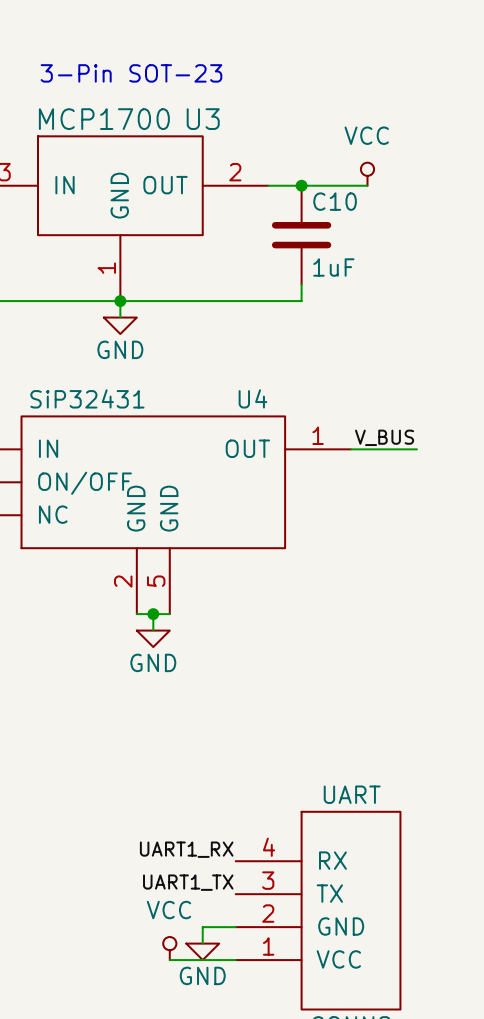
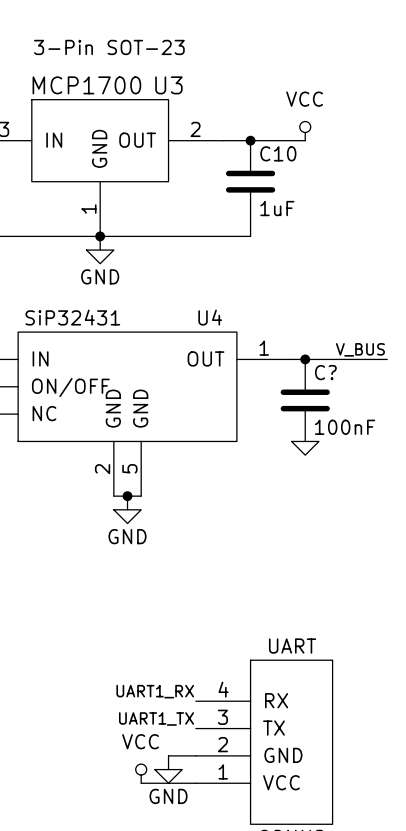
label position: V_BUS (384, 437) -> V_BUS (360, 349)
junction: none -> (305, 359)
wire: none -> (346, 359) (387, 359)
C?: none -> 100nF (305, 400)
power symbol: none -> (305, 448)

